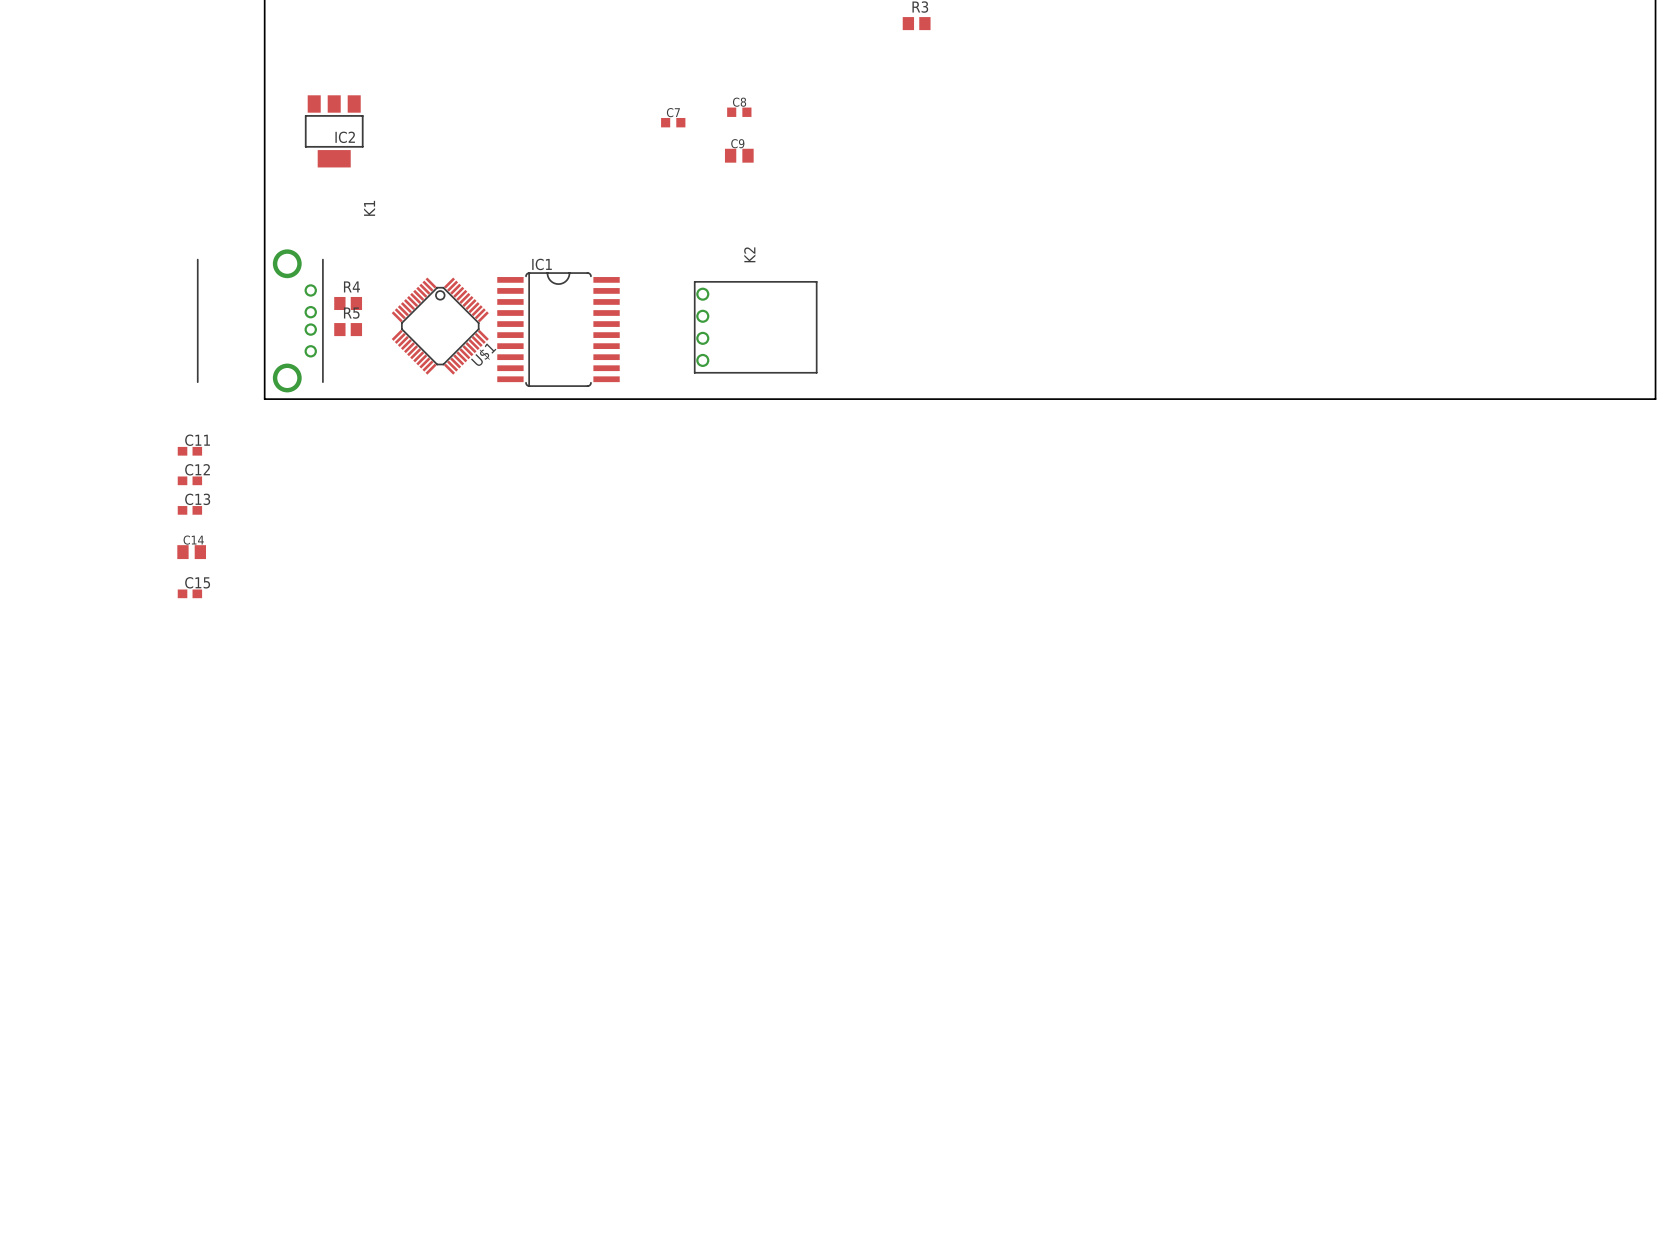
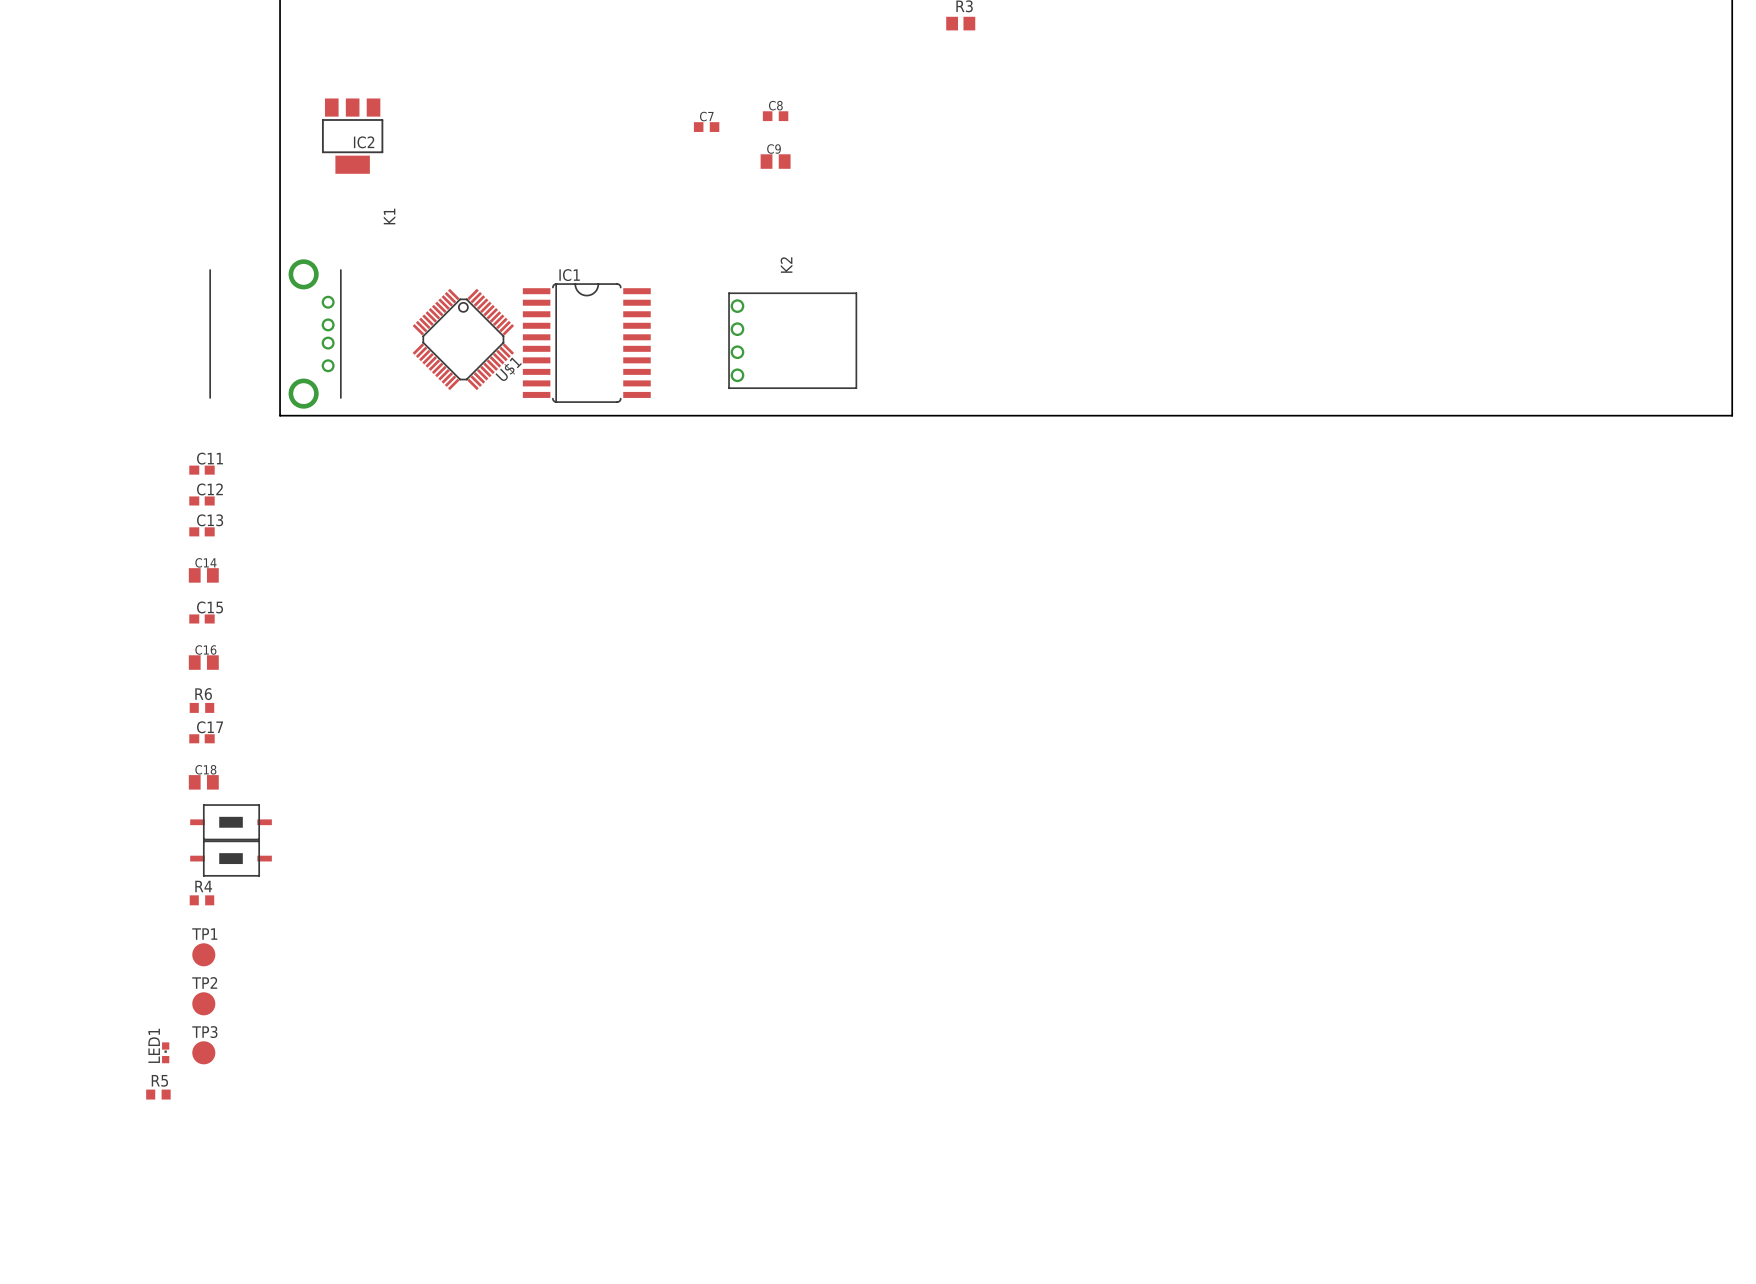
R4 footprint: [334, 296, 363, 311] -> [189, 895, 215, 906]
R5 footprint: [334, 323, 363, 337] -> [146, 1089, 171, 1100]
C16: none -> (203, 662)
R6: none -> (201, 707)
C17: none -> (201, 738)
C18: none -> (203, 782)
part: none -> (231, 822)
part: none -> (231, 858)
TP1: none -> (203, 954)
TP2: none -> (203, 1003)
LED1: none -> (165, 1052)
TP3: none -> (203, 1052)

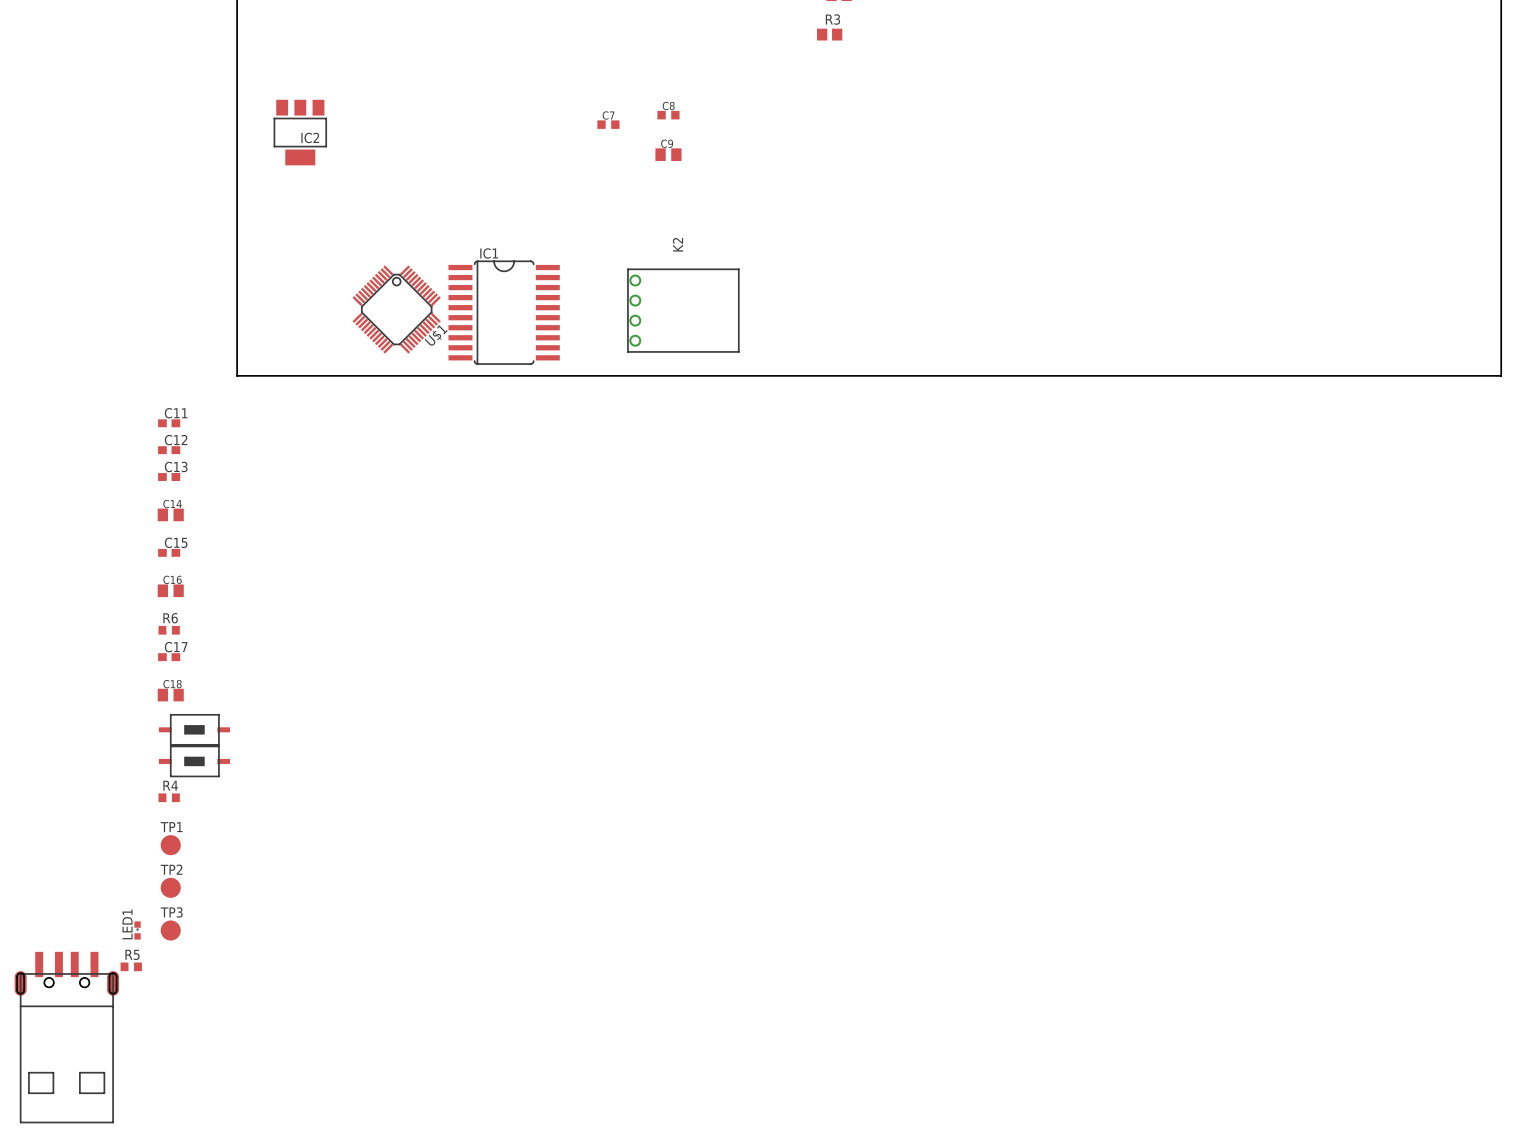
K1: (275, 333) -> none
part: none -> (66, 1037)

